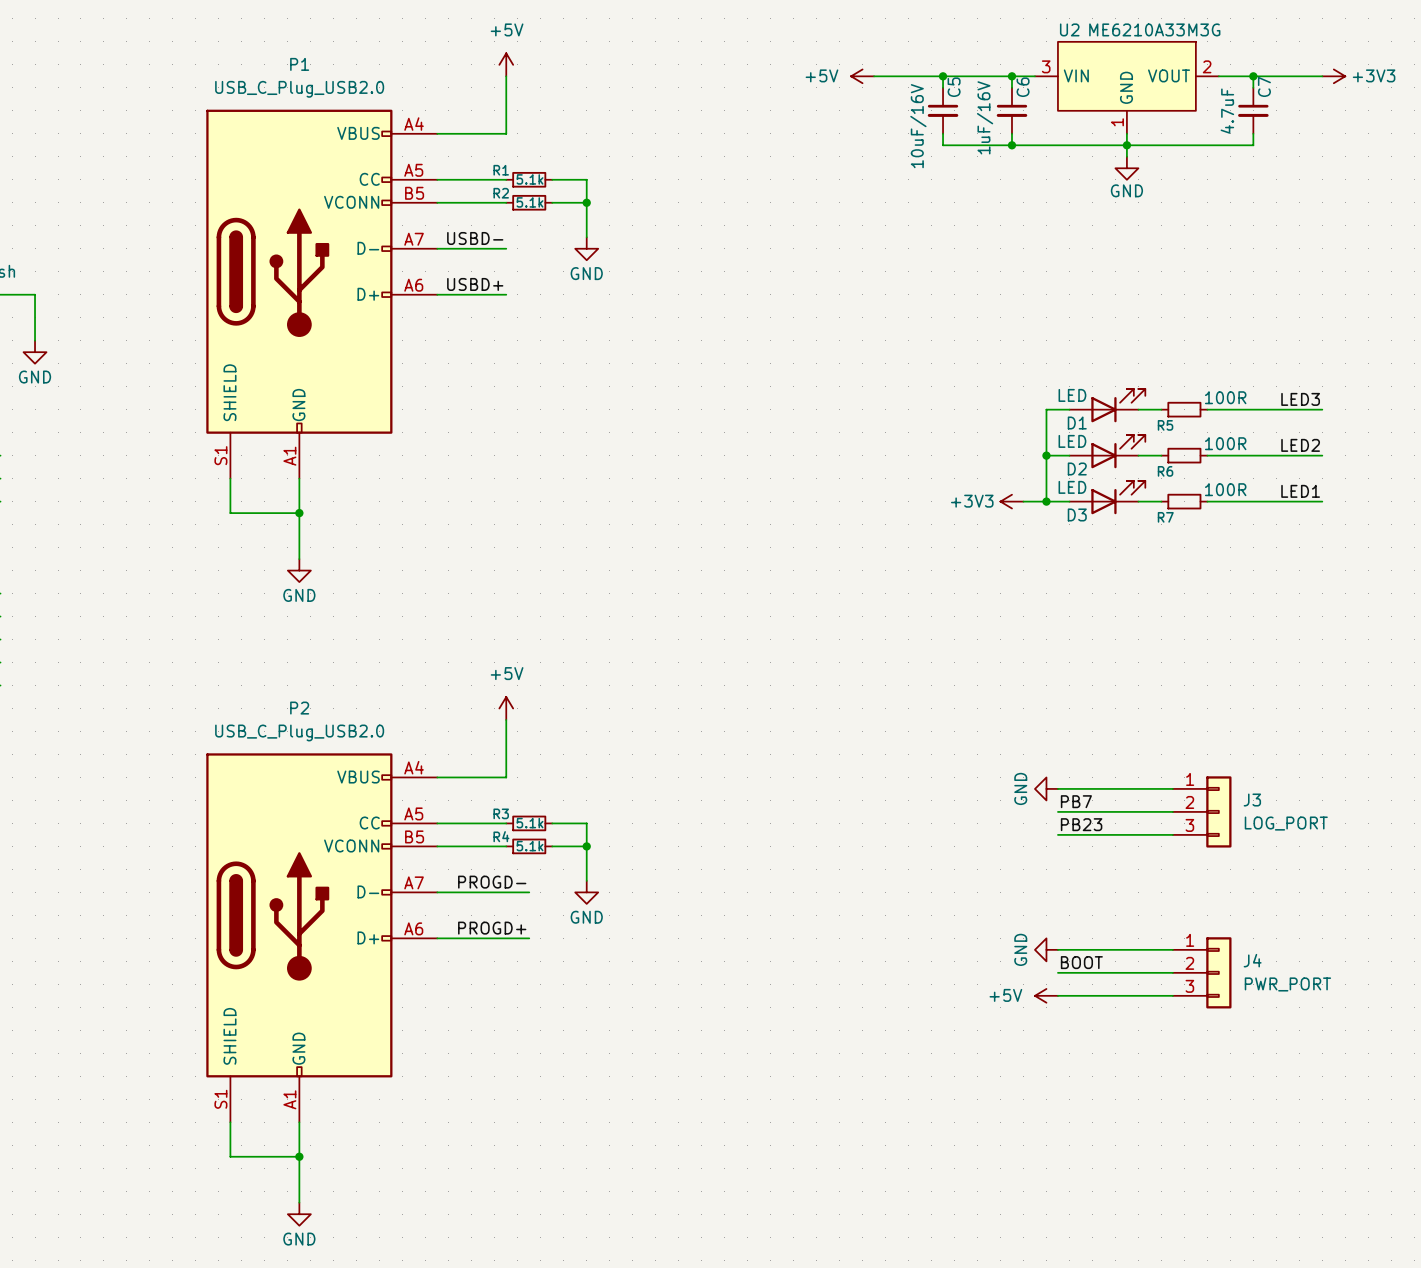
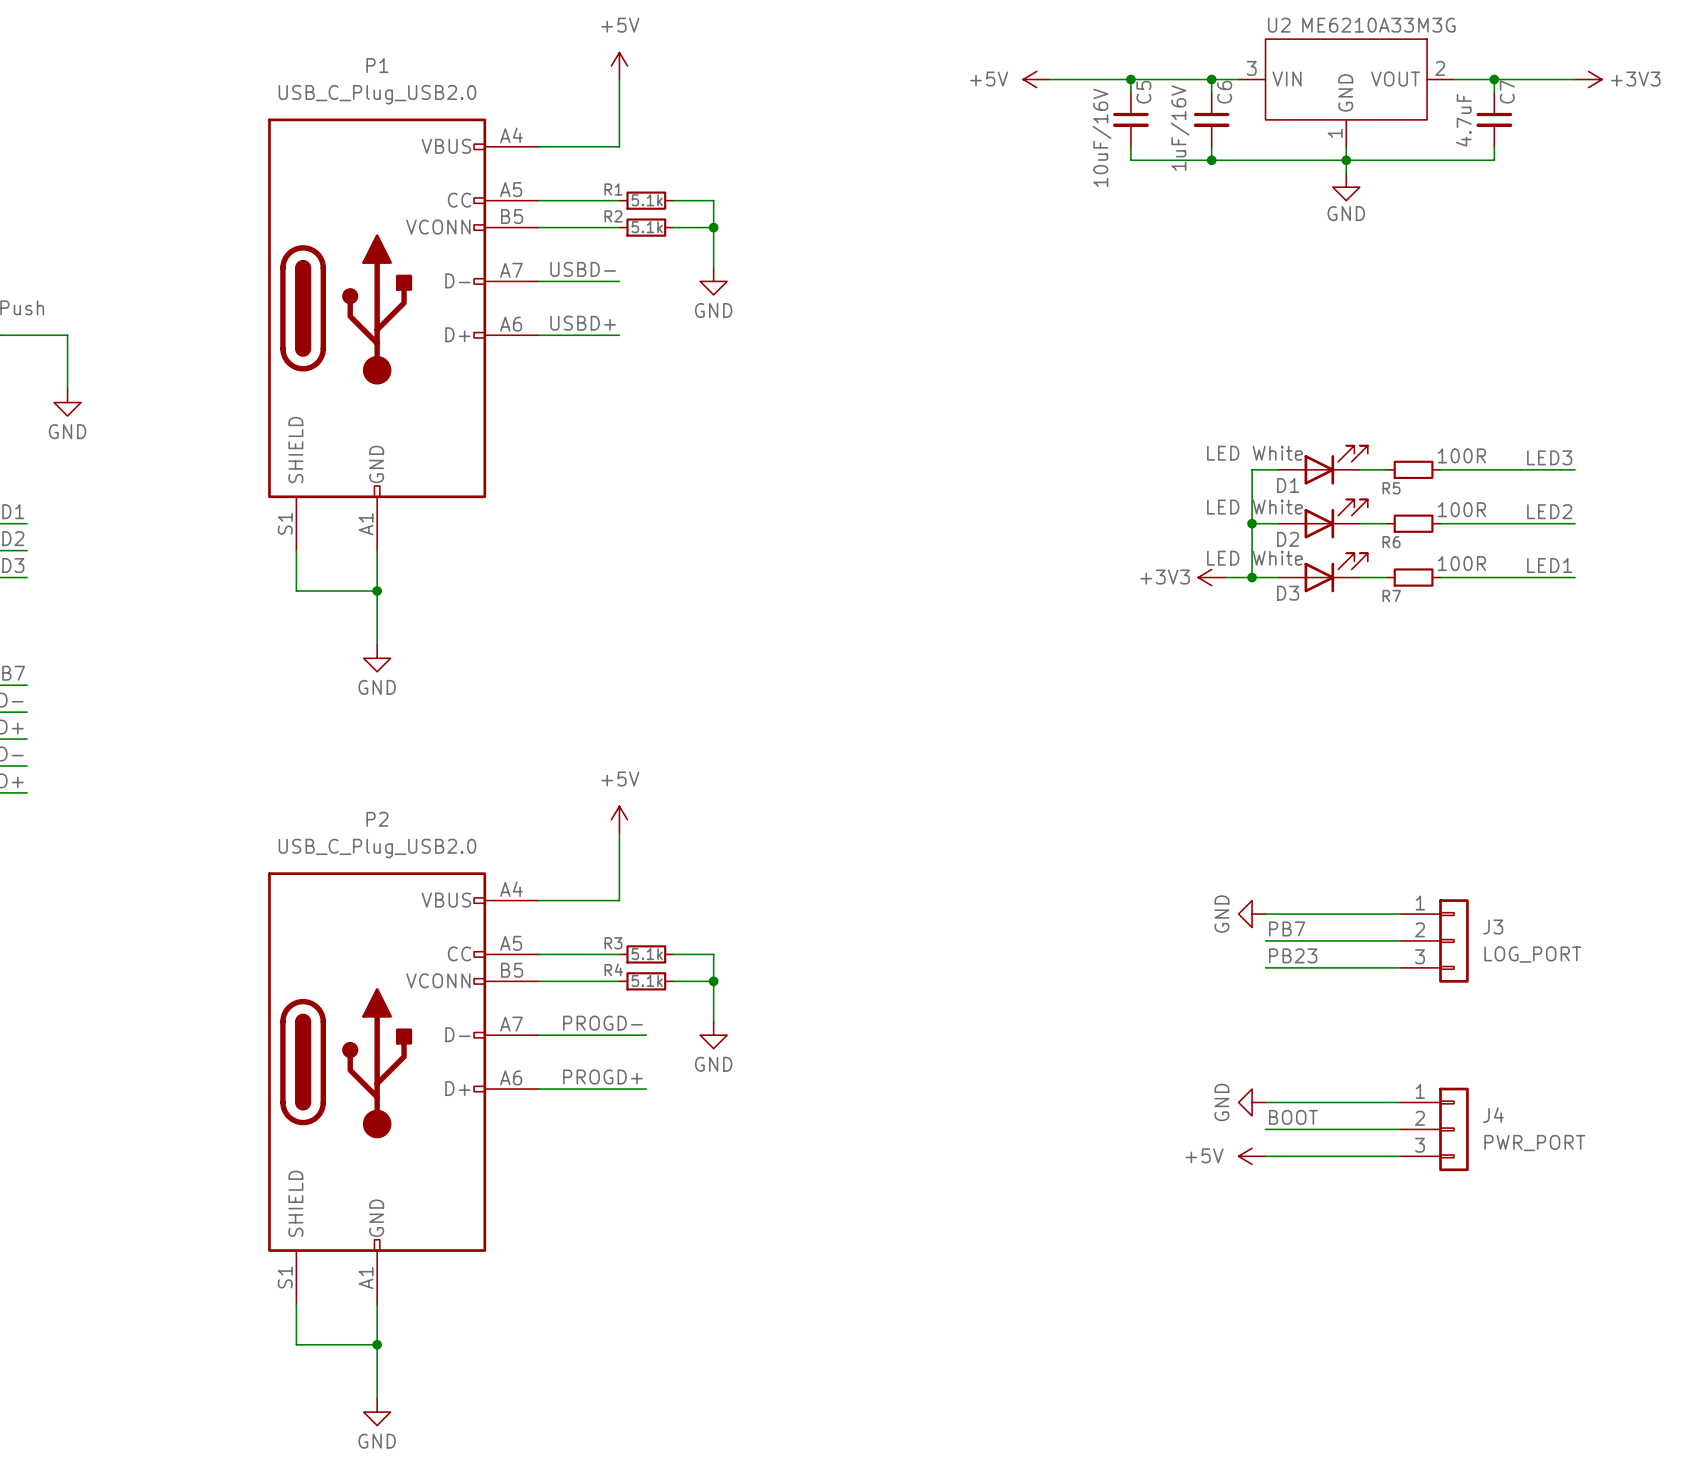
D1 value: LED (1072, 395) -> LED White (1254, 453)
D2 value: LED (1072, 441) -> LED White (1254, 507)
D3 value: LED (1072, 487) -> LED White (1254, 558)

